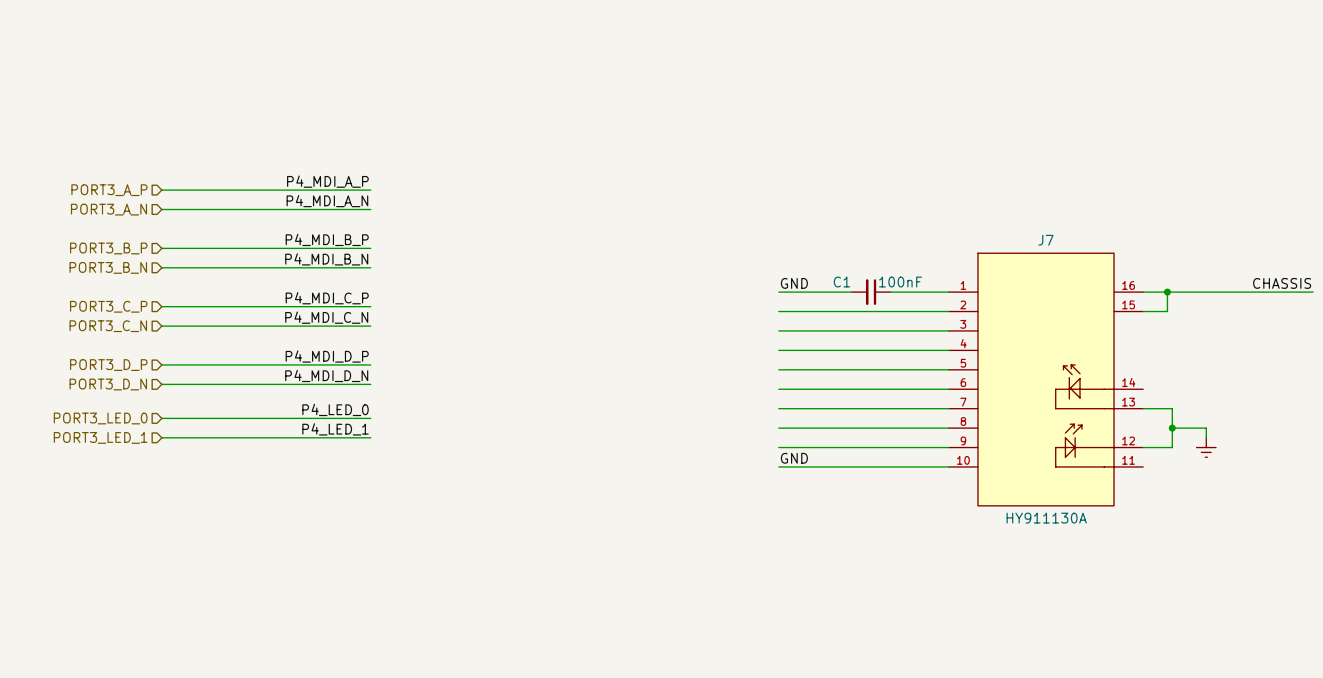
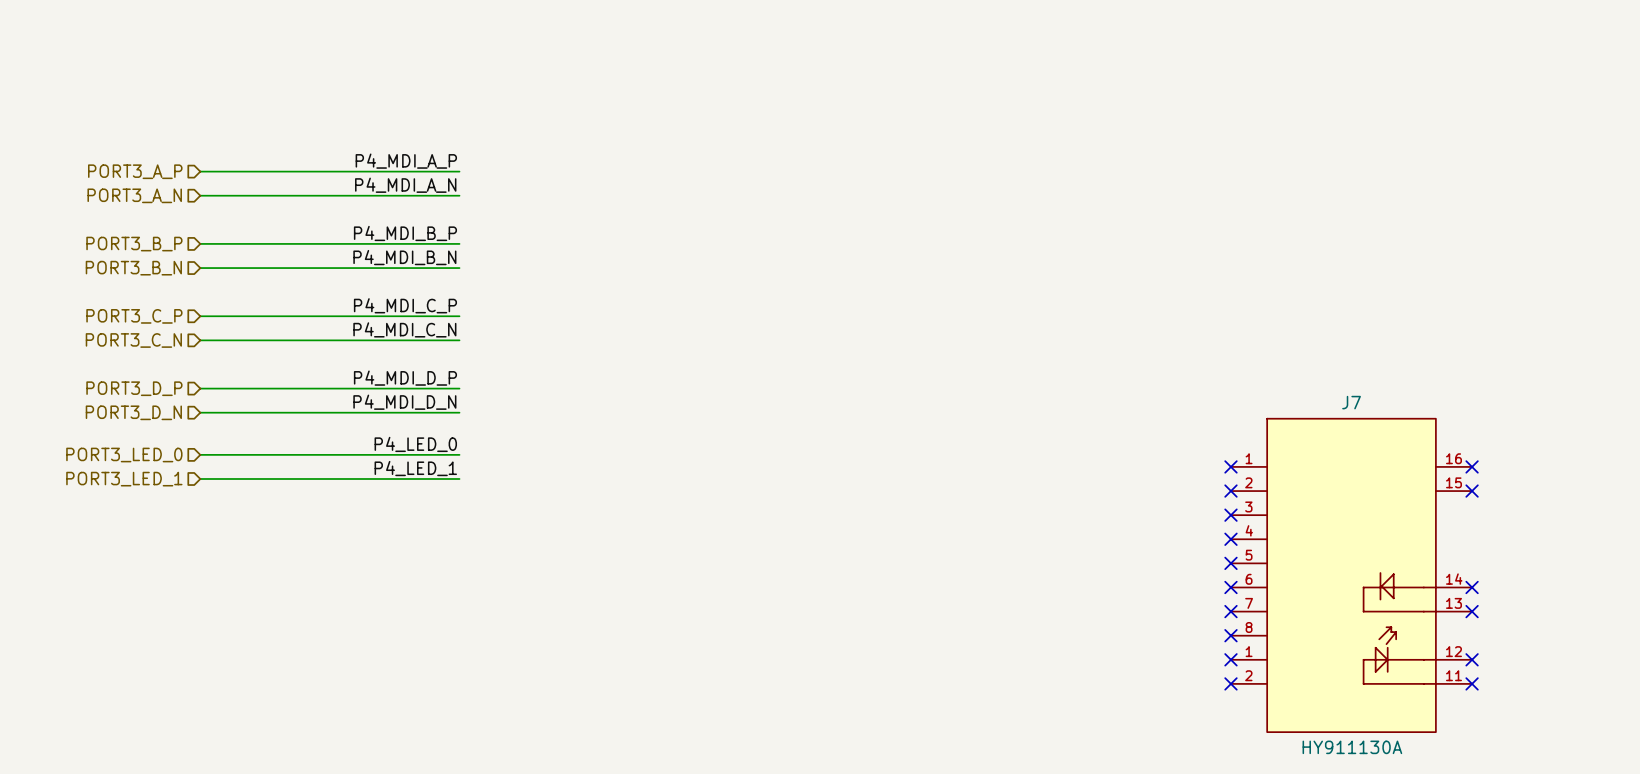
J7 symbol: [948, 253, 1144, 506] -> [1230, 418, 1473, 733]
label: GND (794, 283) -> none
label: CHASSIS (1282, 283) -> none
wire: (778, 292) (851, 292) -> none
C1: 100nF (871, 292) -> none
wire: (890, 292) (948, 292) -> none
wire: (1143, 292) (1313, 292) -> none
wire: (1167, 292) (1167, 311) (1143, 311) -> none
junction: (1167, 292) -> none
wire: (778, 311) (948, 311) -> none
wire: (778, 330) (948, 330) -> none
wire: (778, 350) (948, 350) -> none
wire: (778, 369) (948, 369) -> none
wire: (778, 389) (948, 389) -> none
wire: (778, 408) (948, 408) -> none
wire: (1143, 408) (1172, 408) (1172, 447) (1143, 447) -> none
wire: (778, 428) (948, 428) -> none
no-connect mark: none -> (1230, 466)
wire: (1172, 428) (1206, 428) (1206, 437) -> none
junction: (1172, 428) -> none
no-connect mark: none -> (1472, 466)
wire: (778, 447) (948, 447) -> none
no-connect mark: none -> (1230, 491)
no-connect mark: none -> (1472, 491)
power symbol: (1206, 447) -> none
label: GND (794, 458) -> none
wire: (778, 466) (948, 466) -> none
no-connect mark: none -> (1230, 515)
no-connect mark: none -> (1230, 539)
no-connect mark: none -> (1230, 563)
no-connect mark: none -> (1230, 587)
no-connect mark: none -> (1472, 587)
no-connect mark: none -> (1230, 611)
no-connect mark: none -> (1472, 611)
no-connect mark: none -> (1230, 635)
no-connect mark: none -> (1230, 659)
no-connect mark: none -> (1472, 659)
no-connect mark: none -> (1230, 683)
no-connect mark: none -> (1472, 683)

